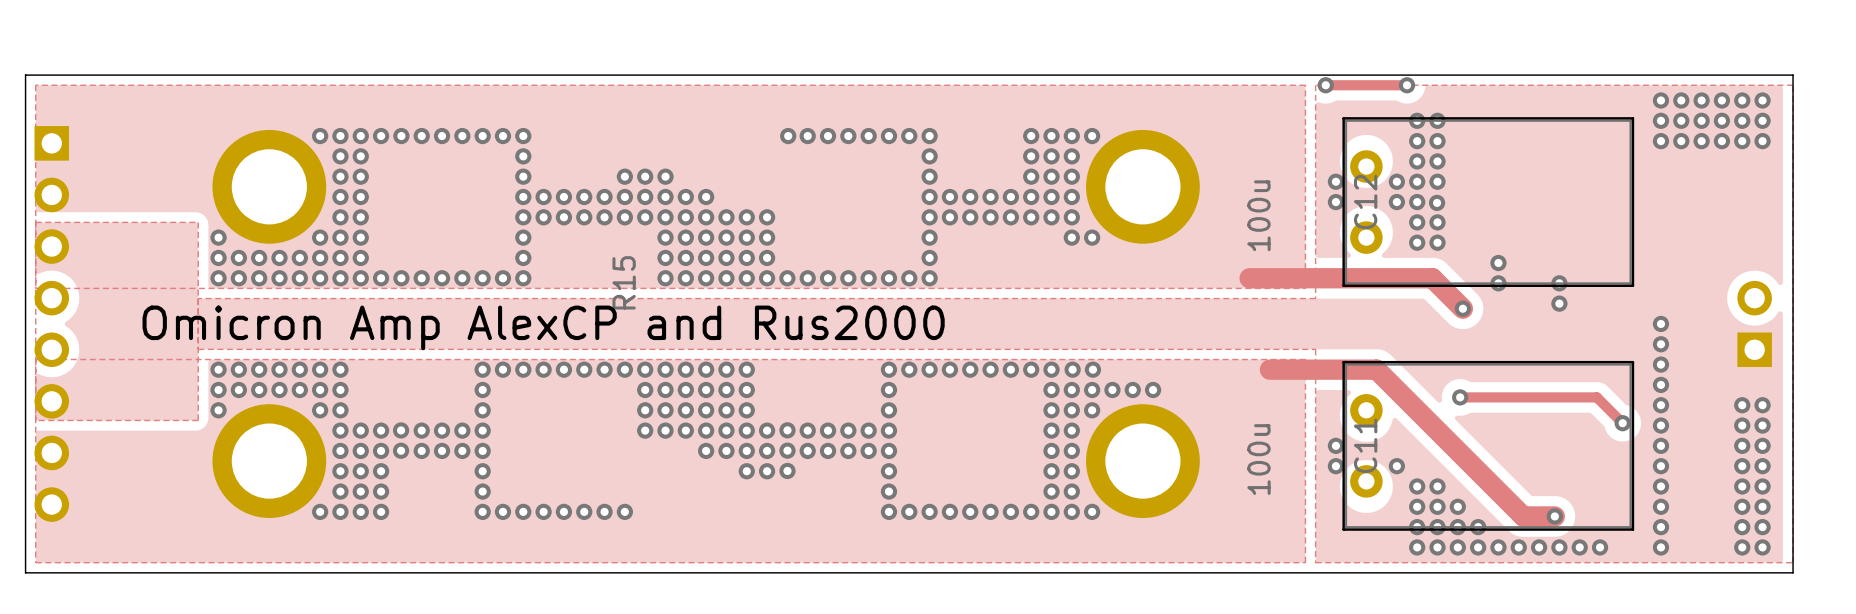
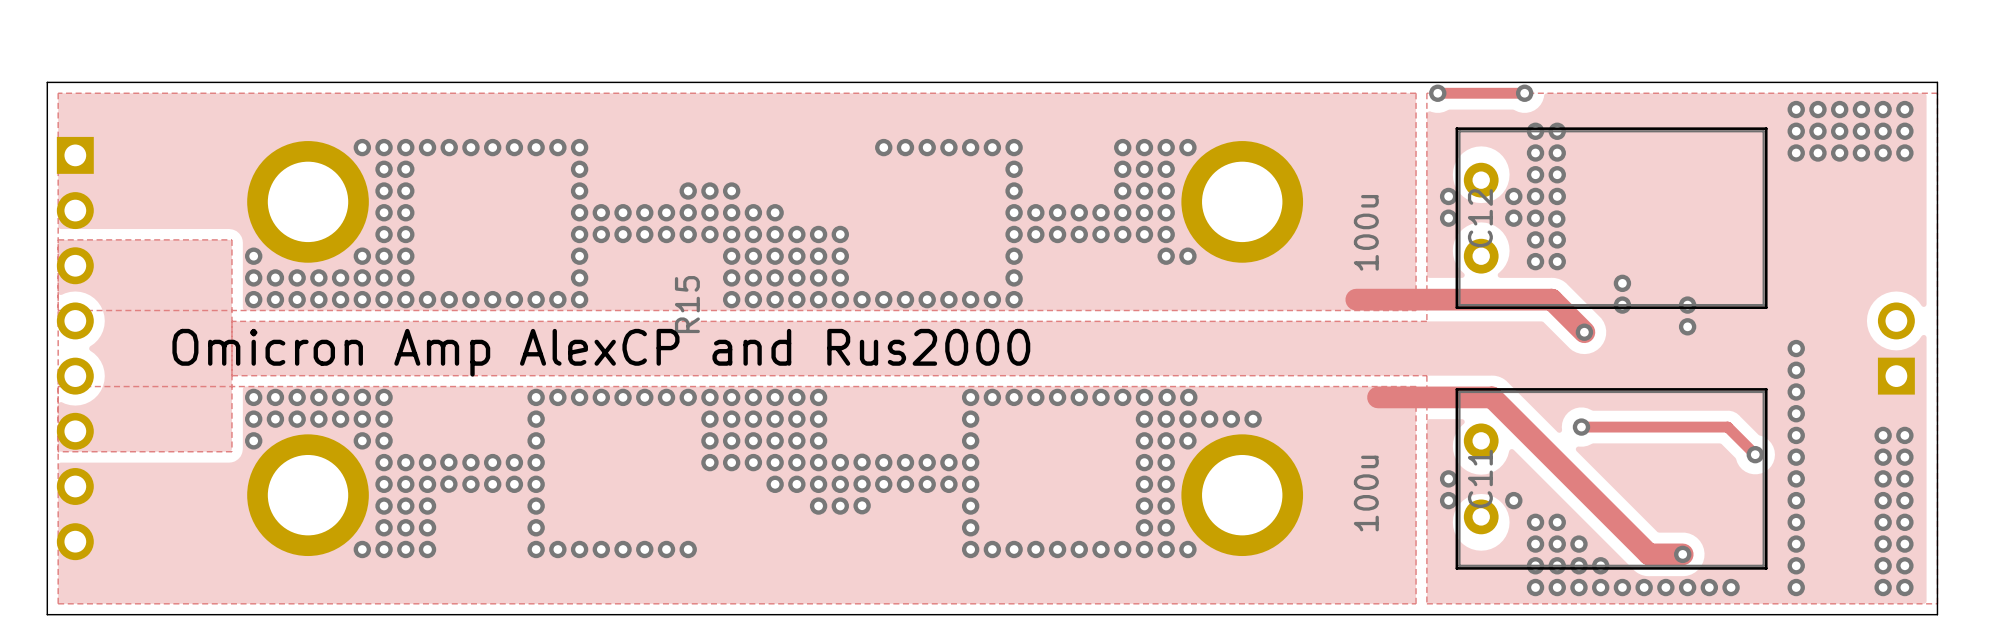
via: (788, 136) -> none

